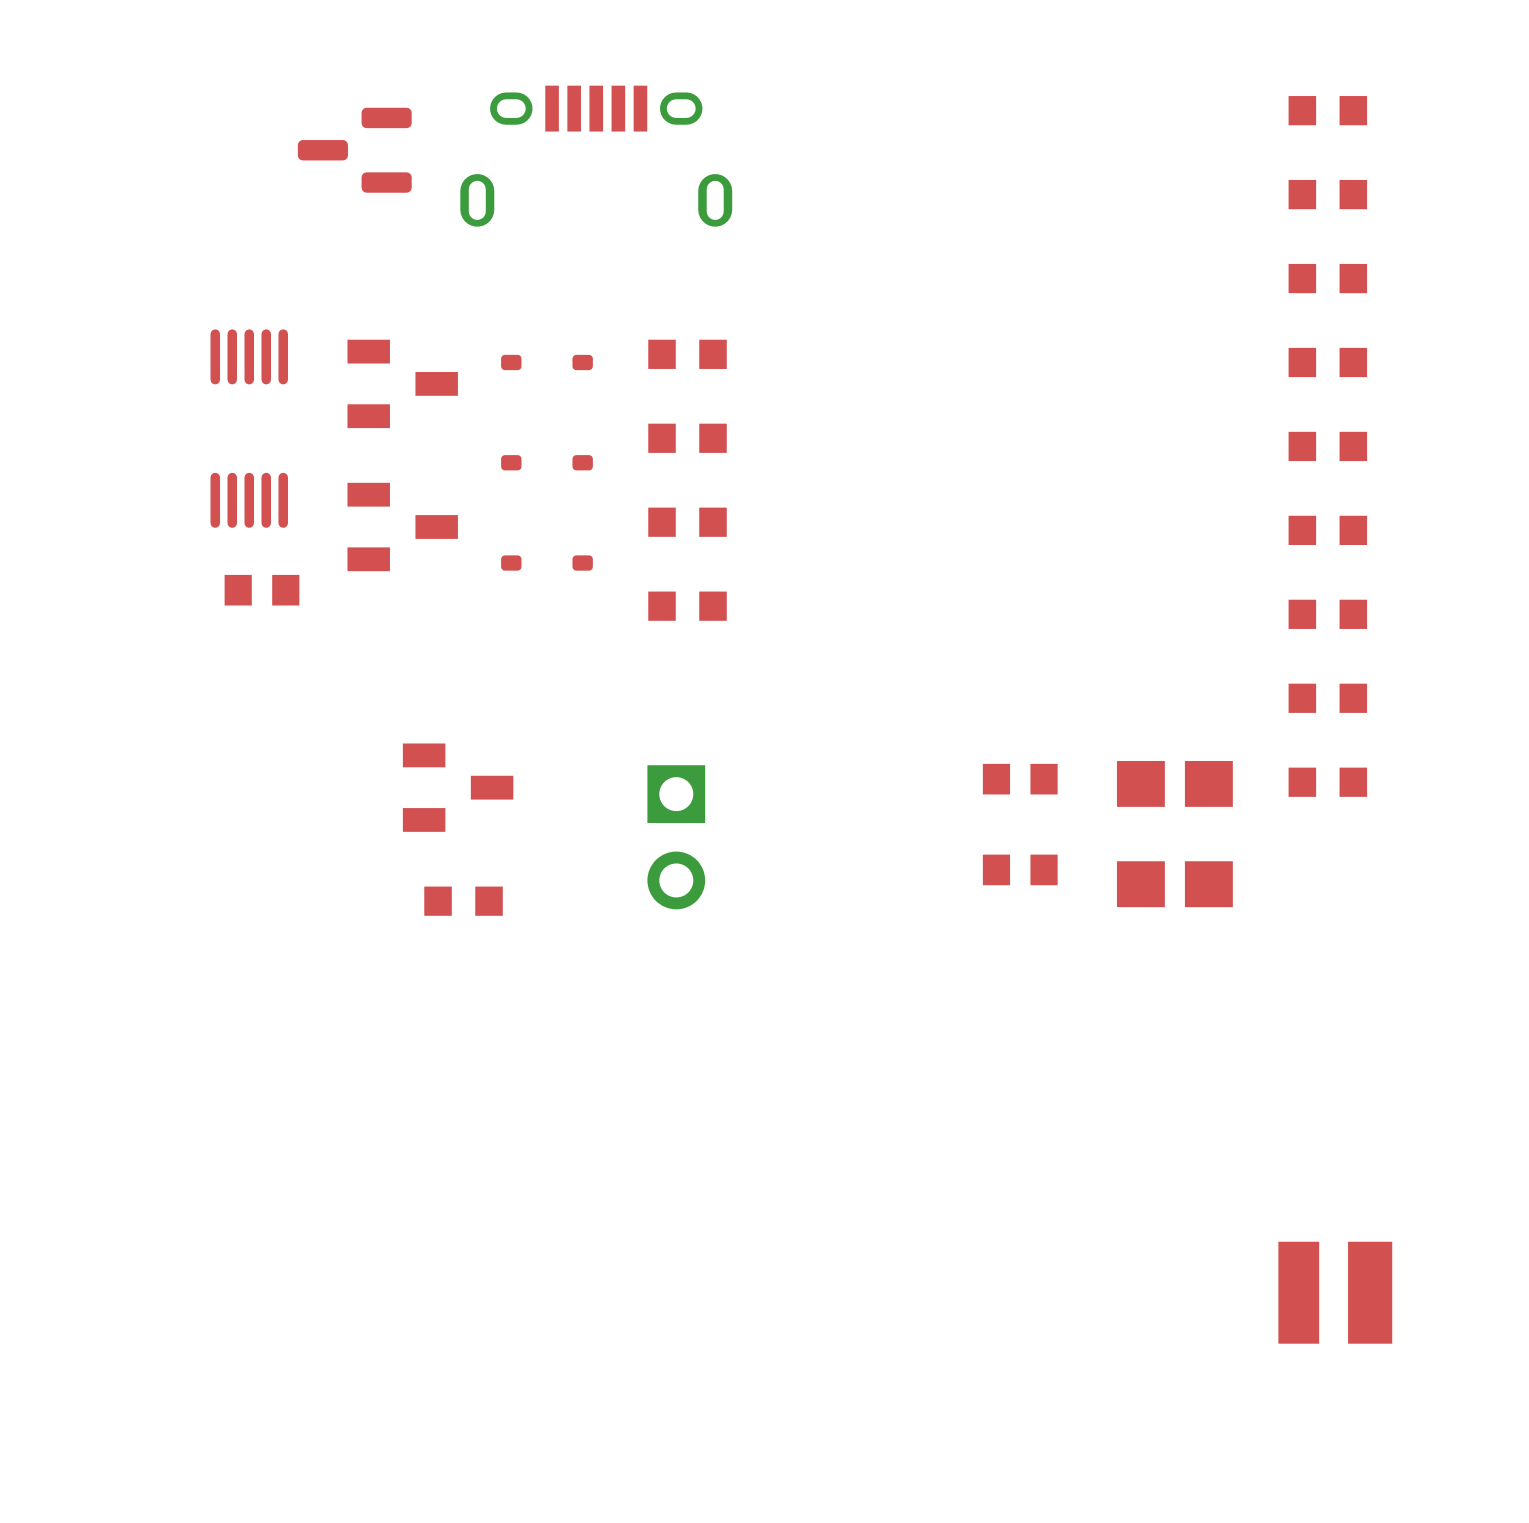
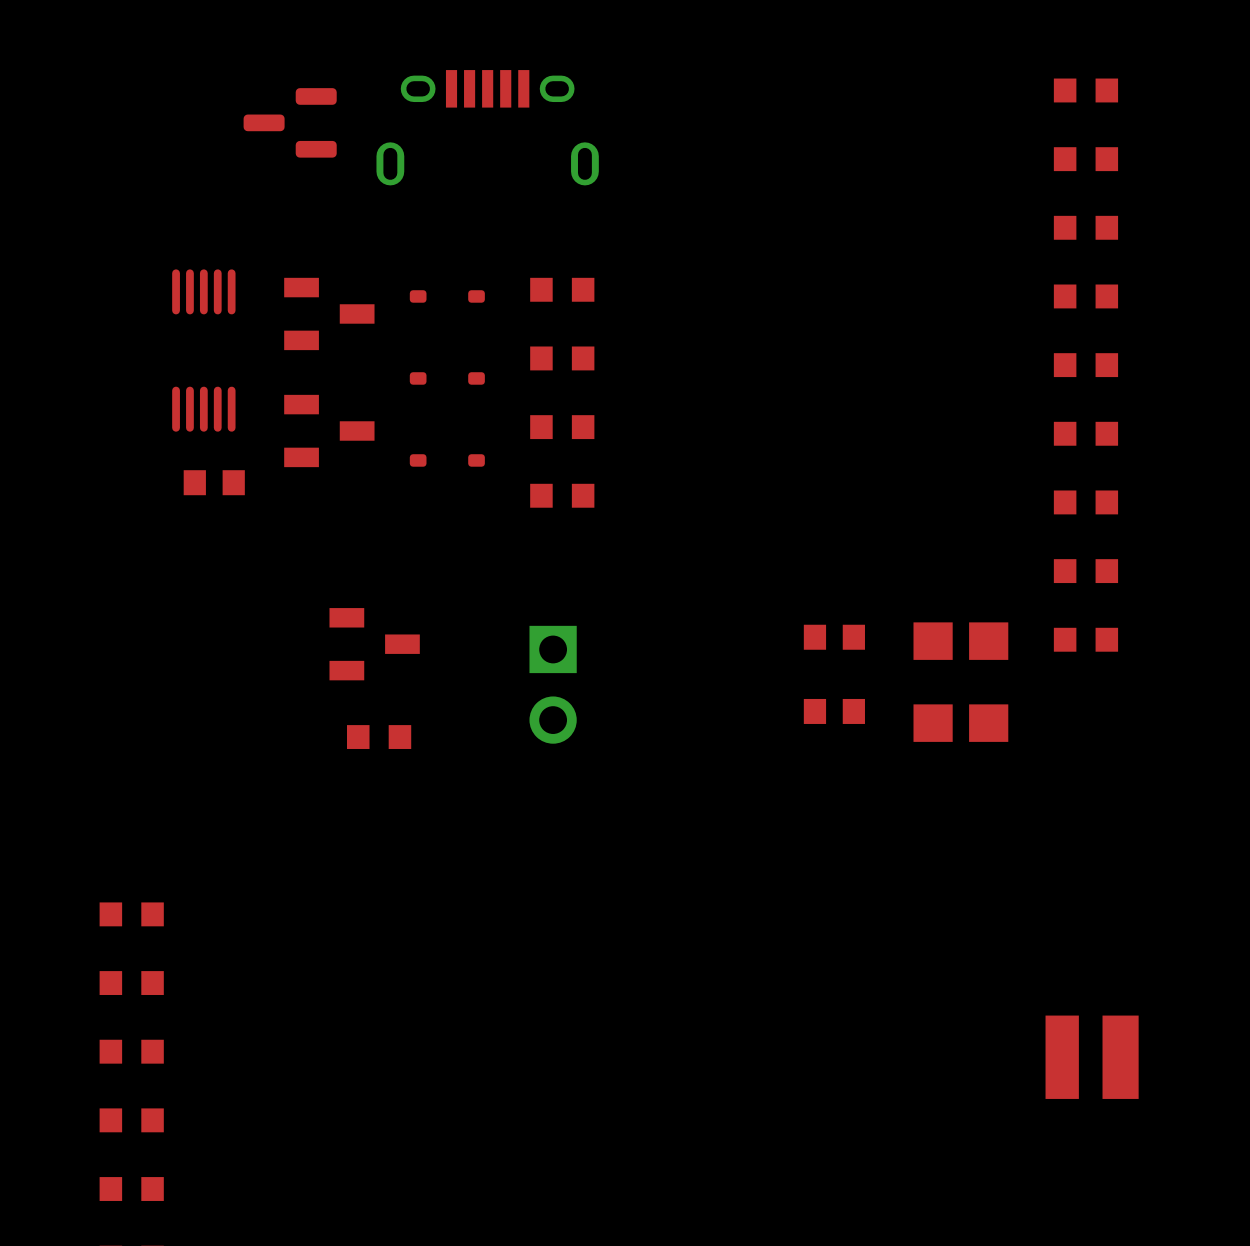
part: none -> (131, 914)
part: none -> (131, 983)
part: none -> (131, 1051)
part: none -> (131, 1120)
part: none -> (131, 1189)

